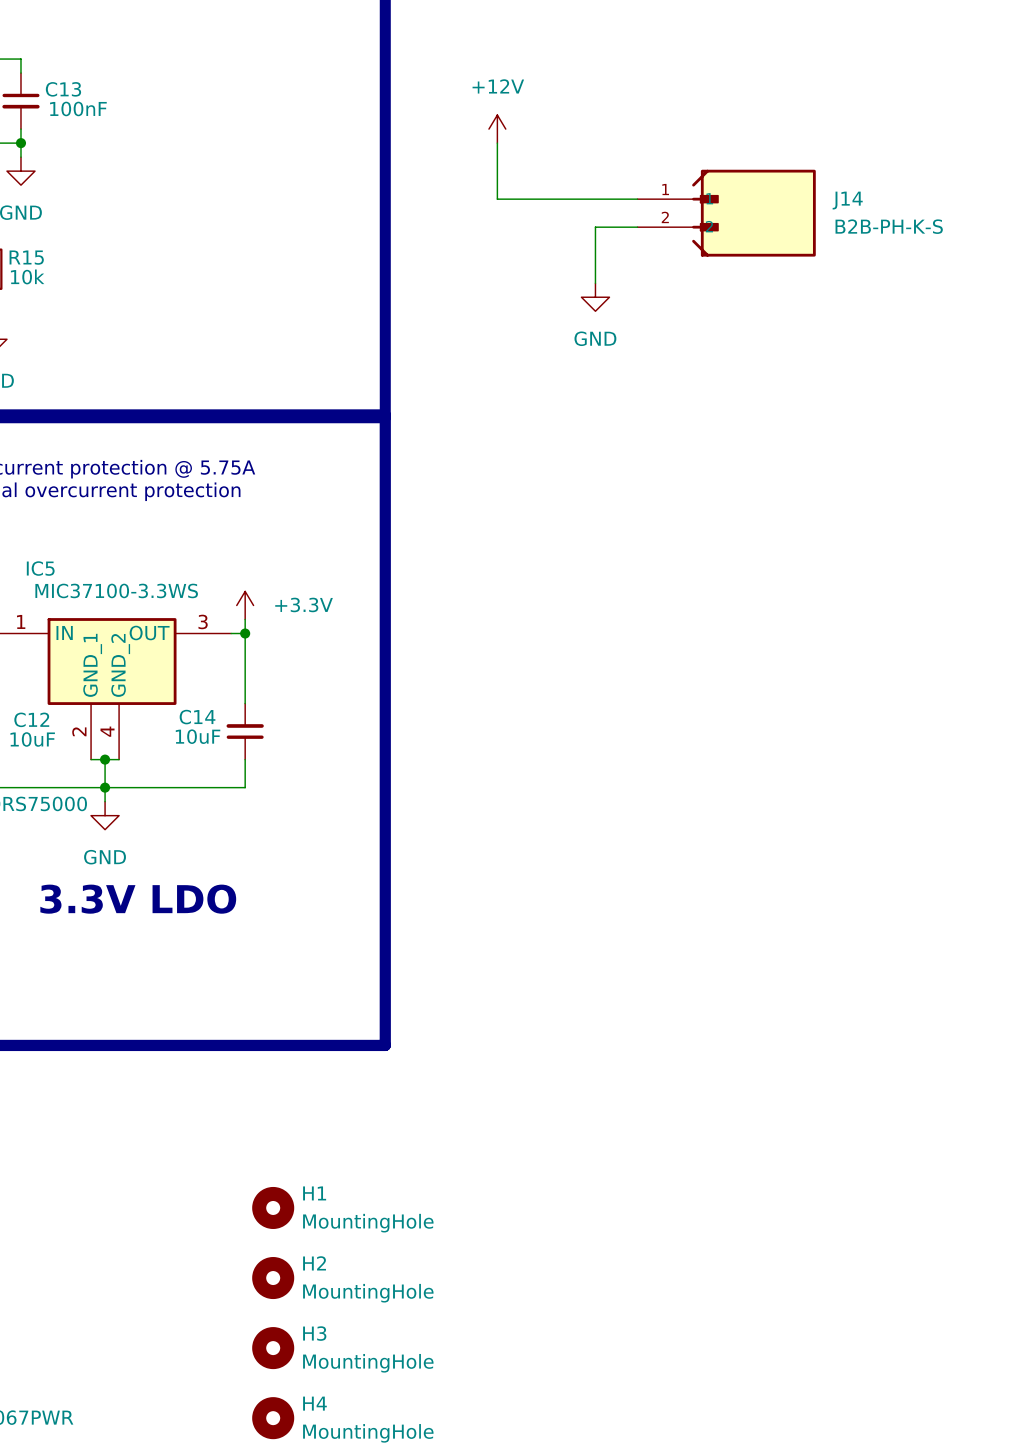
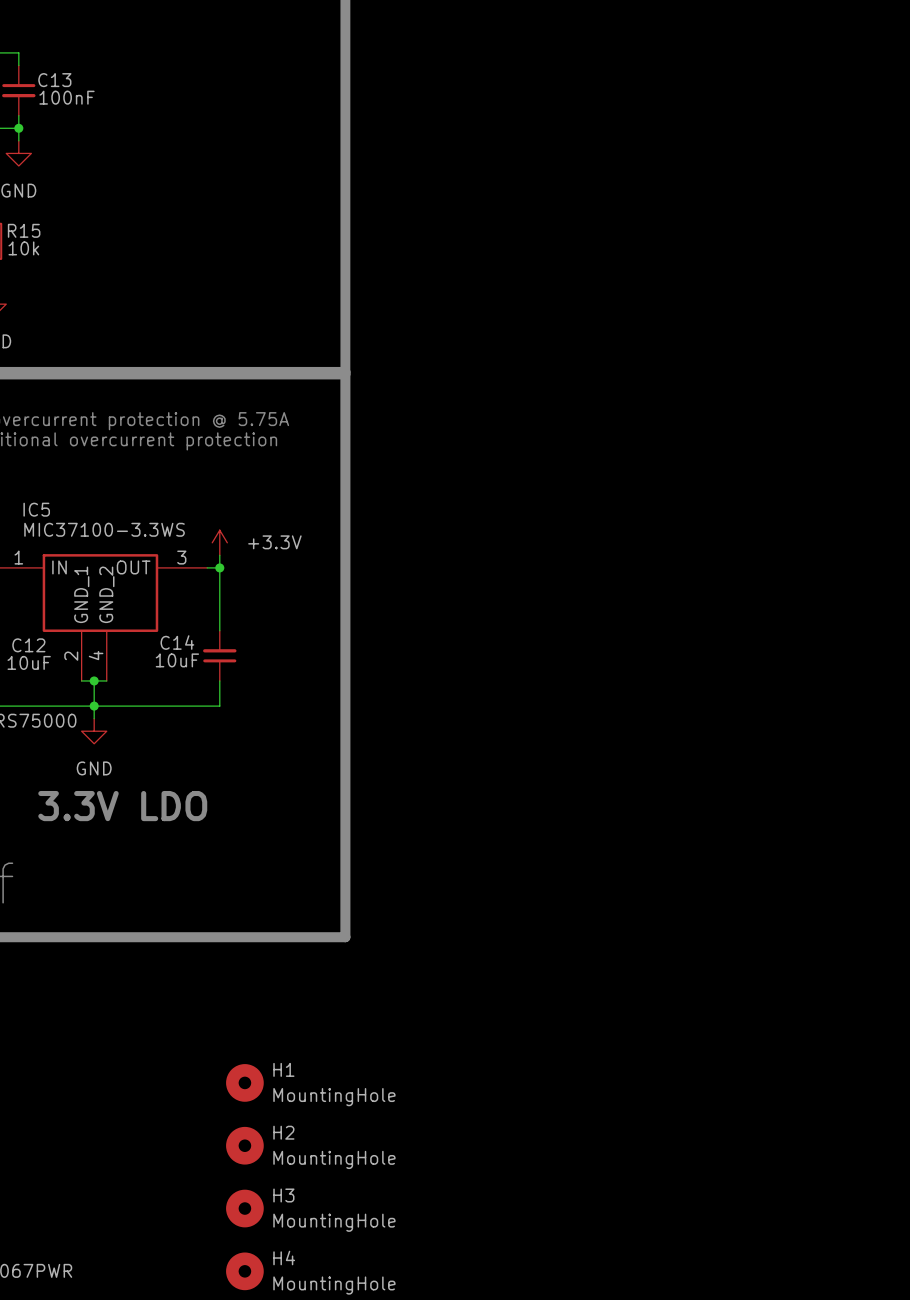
power symbol: +12V (497, 129) -> none
wire: (497, 143) (497, 199) (637, 199) -> none
J14: B2B-PH-K-S (726, 213) -> none
wire: (637, 227) (595, 227) (595, 283) -> none
power symbol: GND (595, 297) -> none

